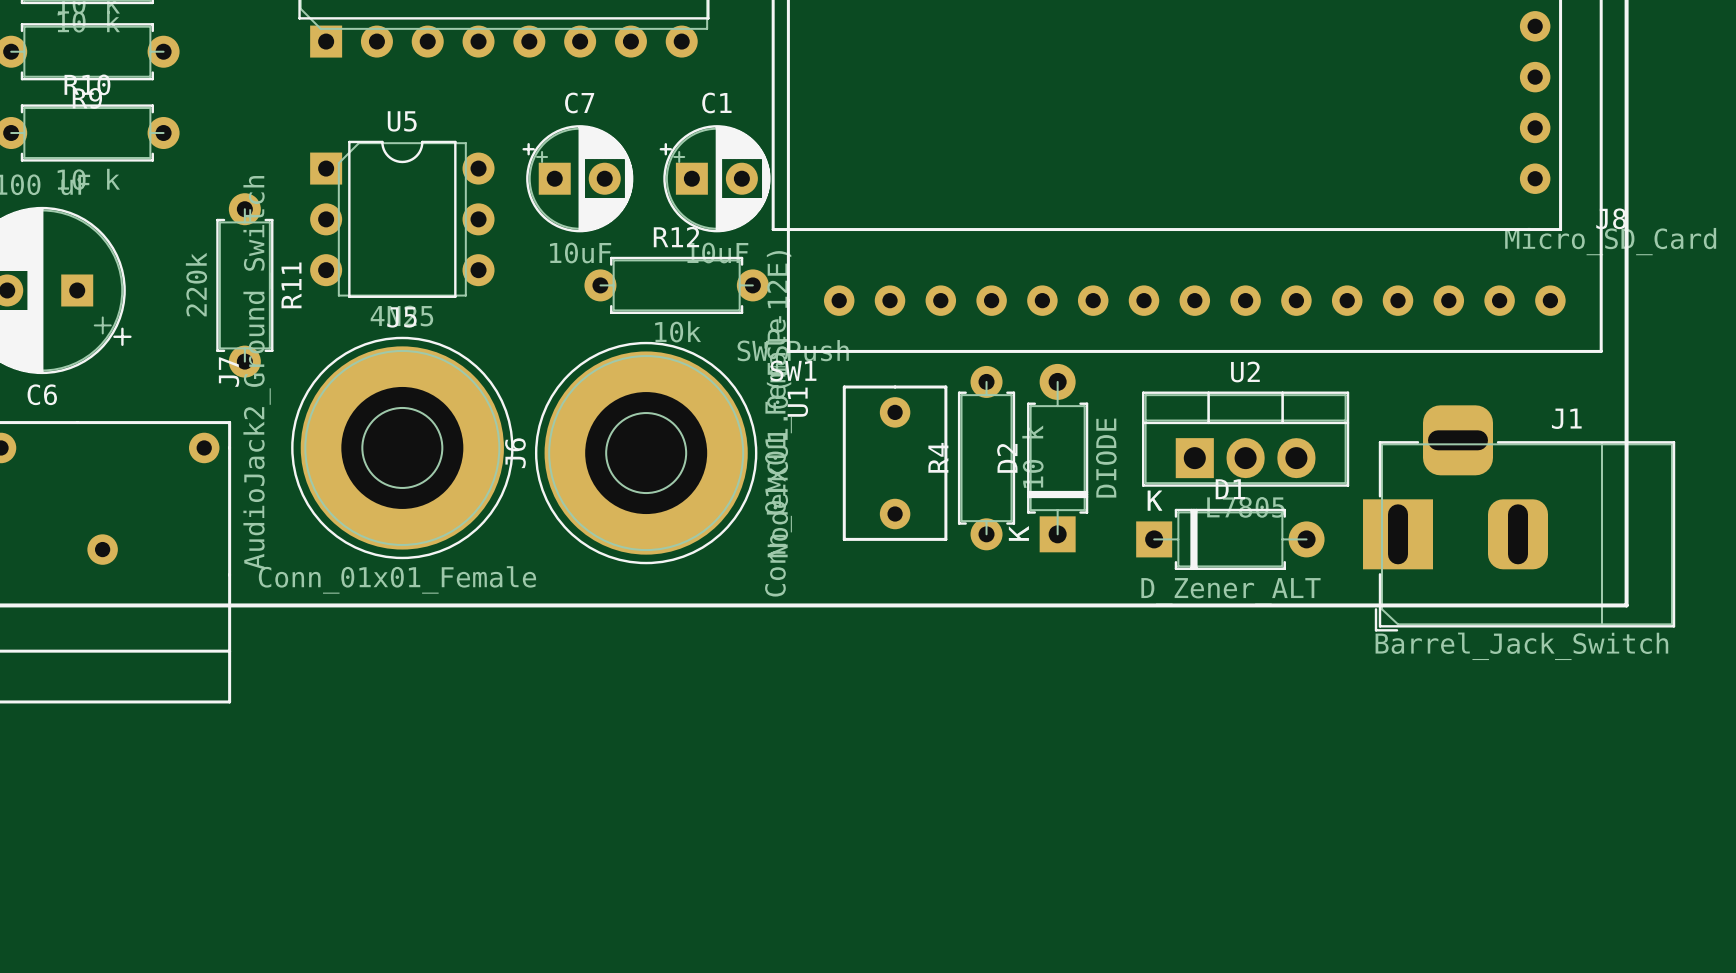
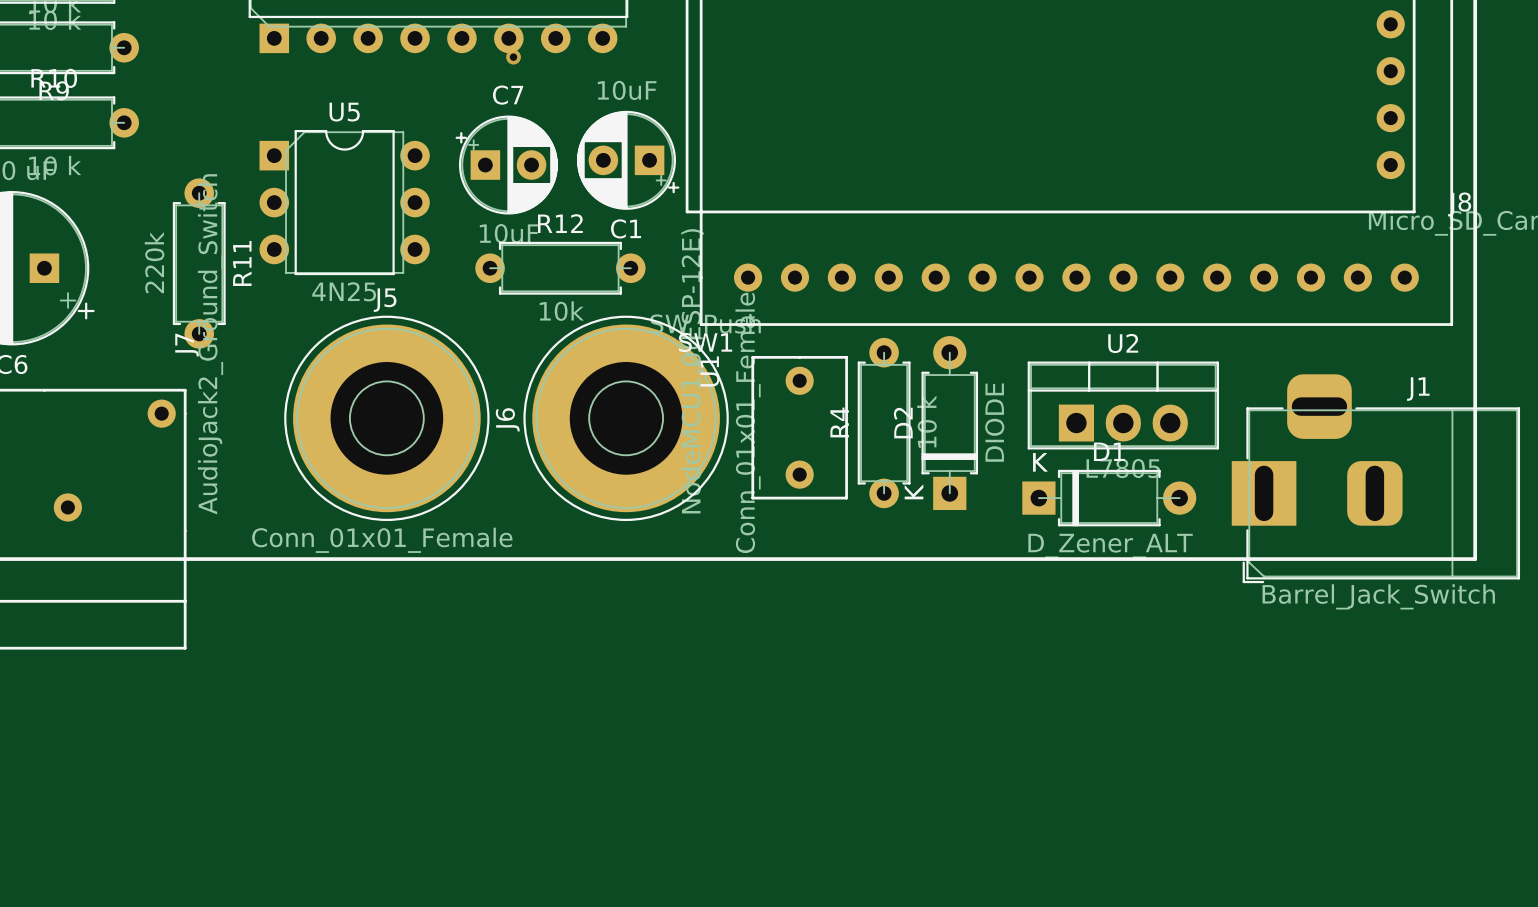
via: none -> (513, 57)
C1 rotation: 0° (715, 178) -> 180° (628, 160)
R12 position: (676, 285) -> (560, 268)
J5 position: (402, 447) -> (386, 418)
J6 position: (646, 453) -> (626, 418)

